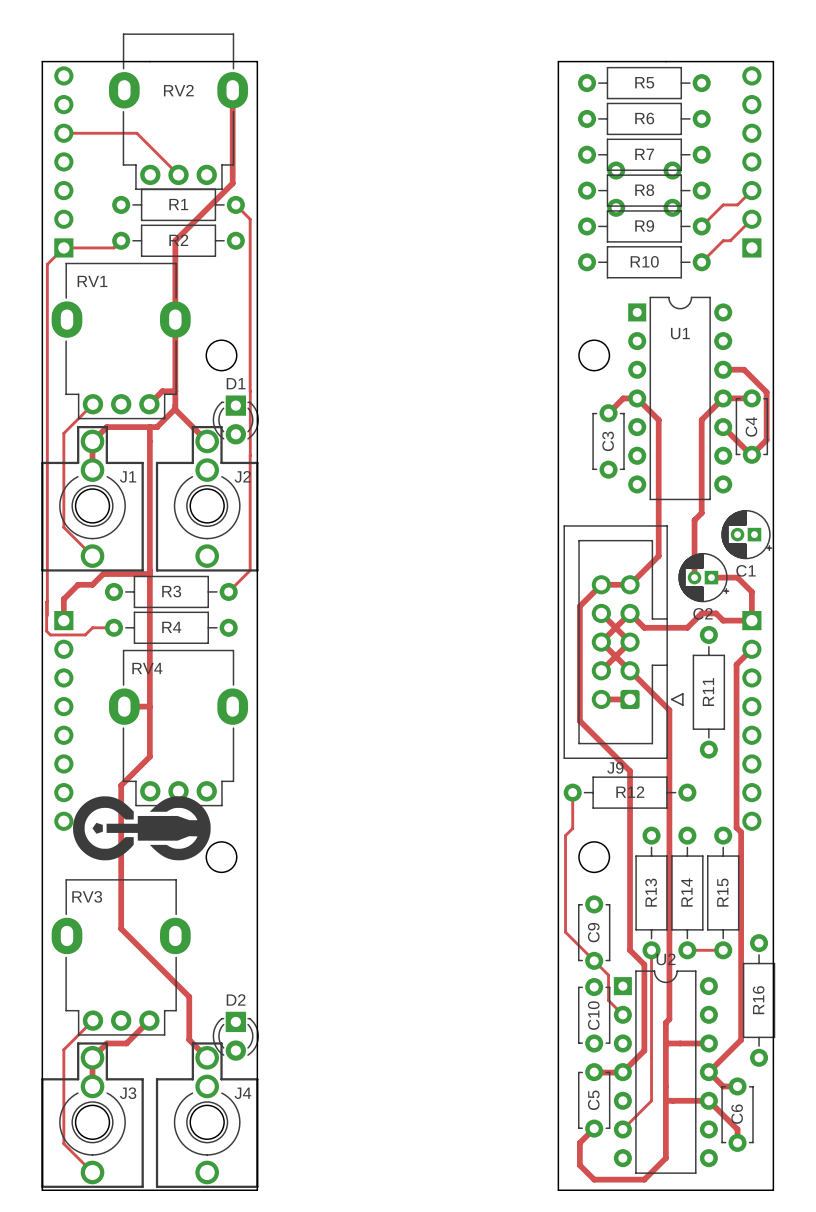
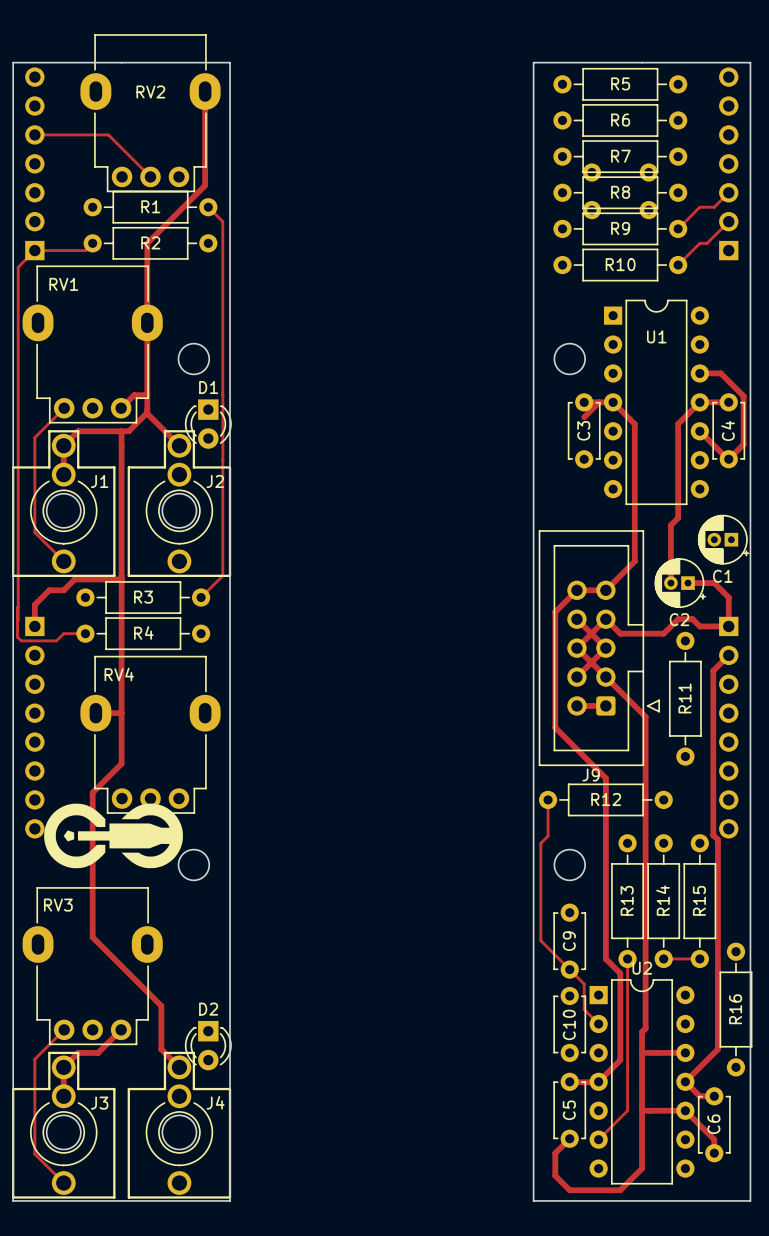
C3 position: (608, 441) -> (584, 430)

